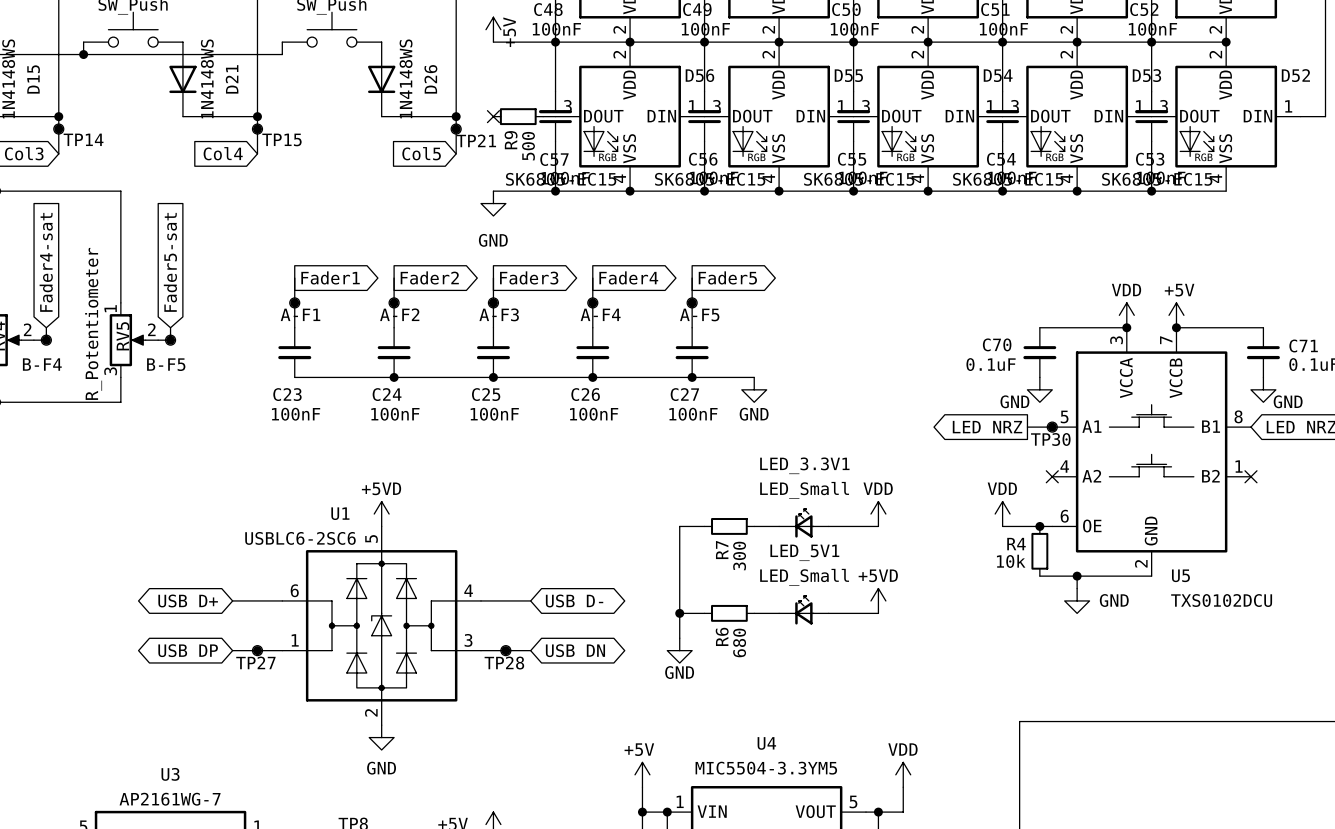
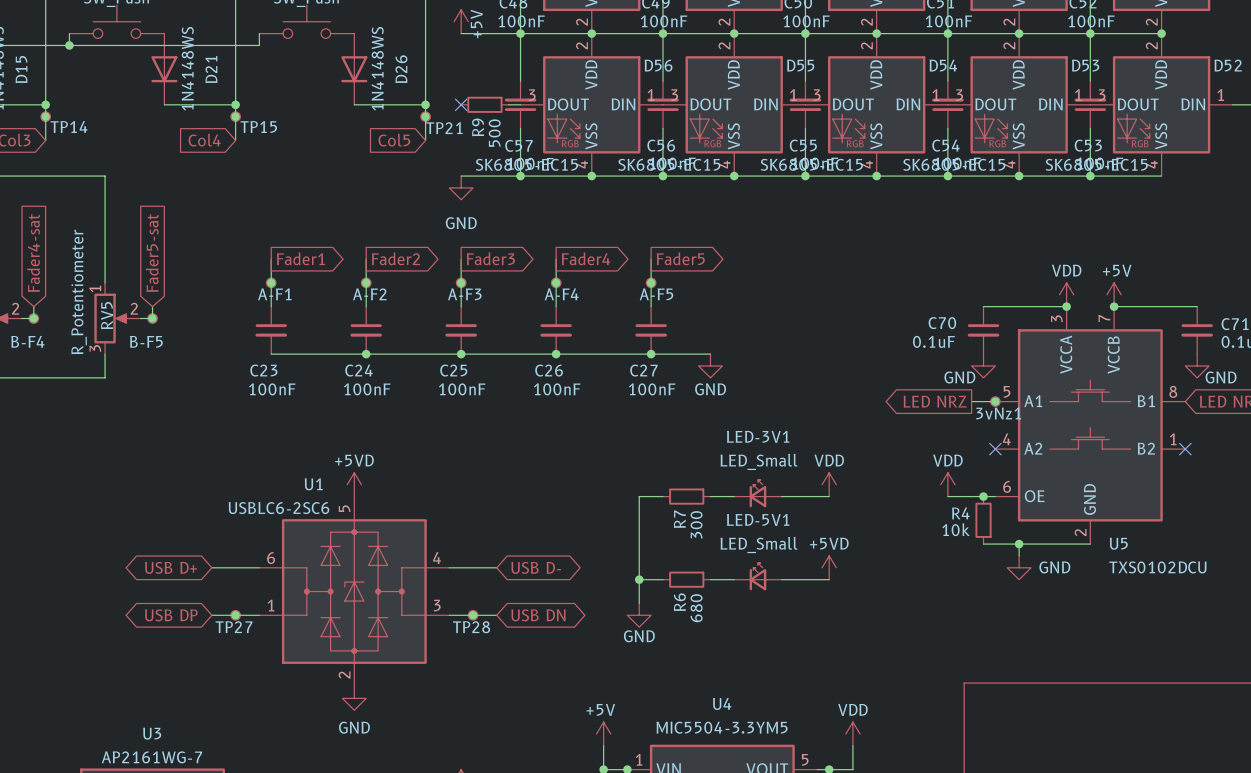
TP30 name: TP30 (1050, 439) -> 3vNz1 (998, 413)
LED_3.3V1 name: LED_3.3V1 (804, 465) -> LED-3V1 (758, 436)
LED_5V1 name: LED_5V1 (804, 552) -> LED-5V1 (758, 519)

